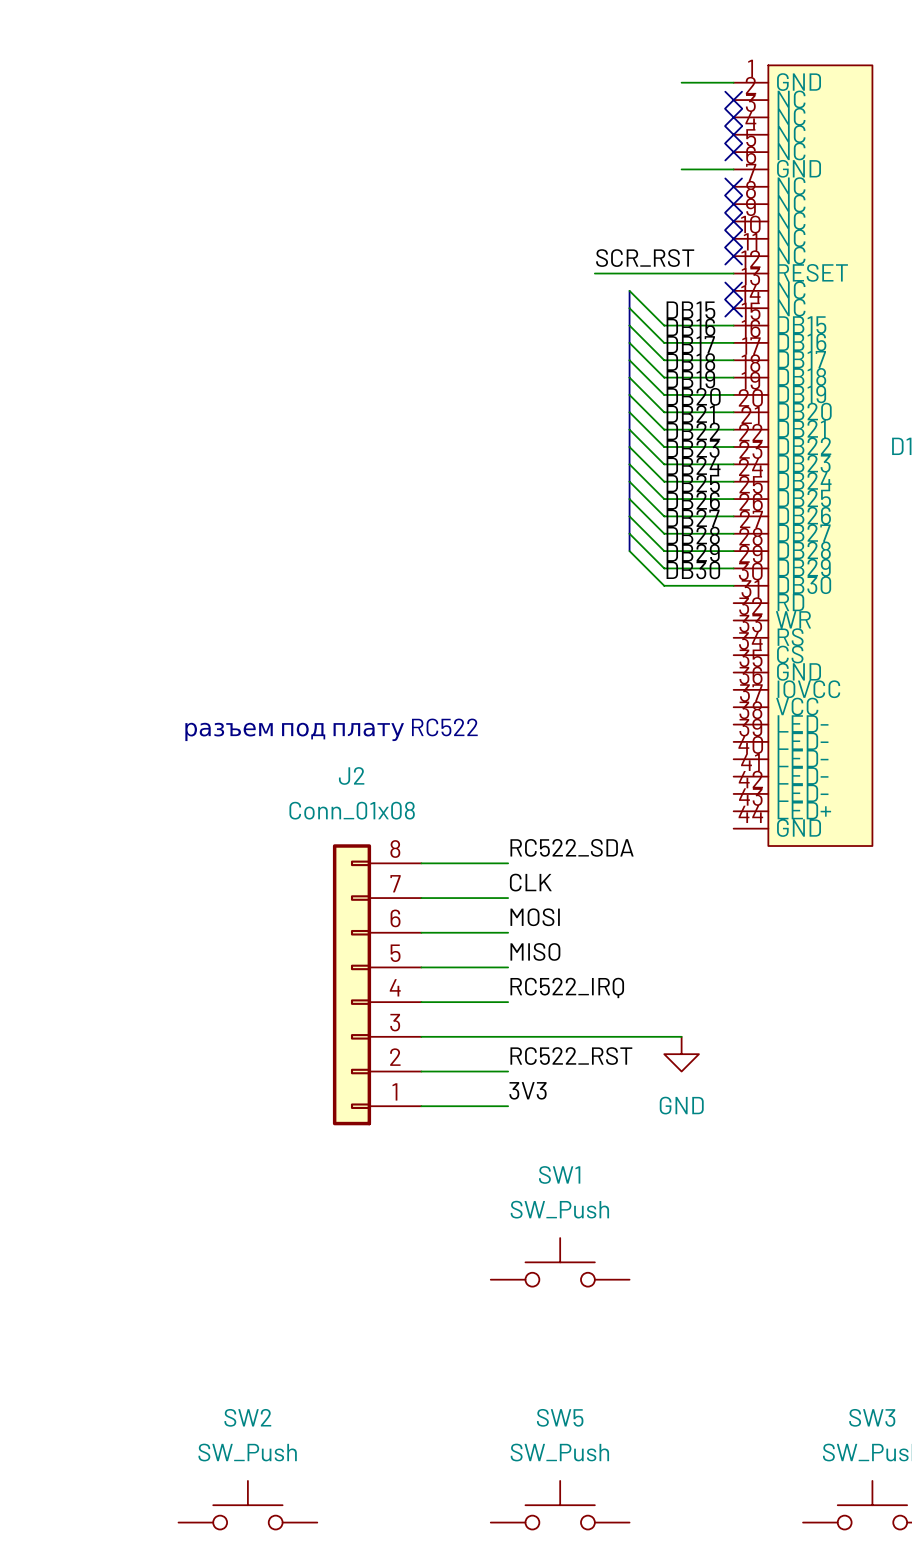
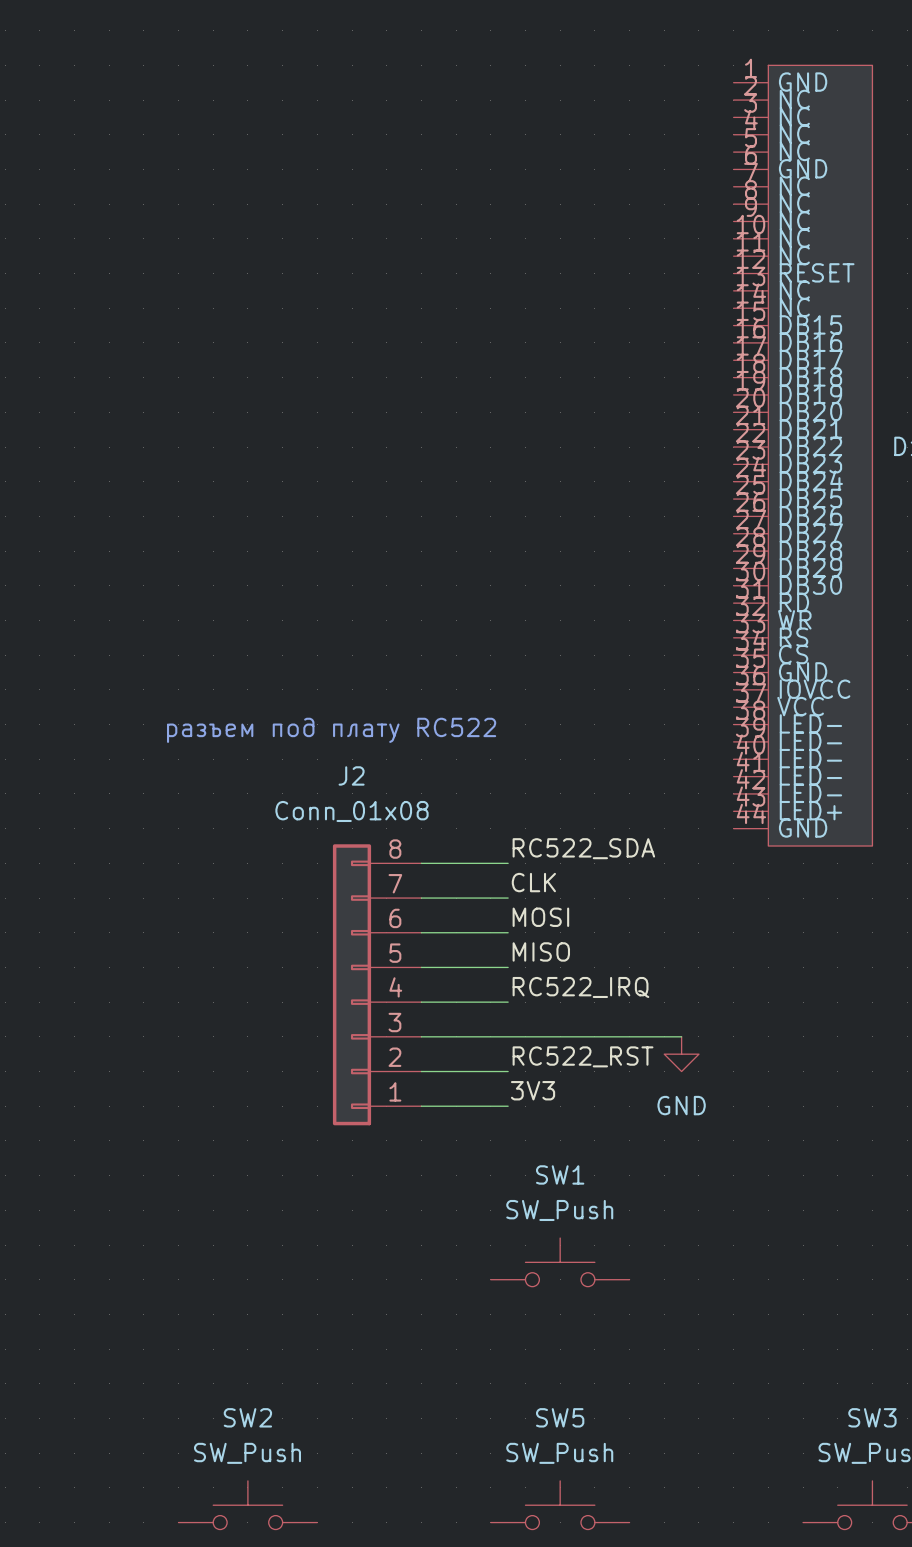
wire: (681, 82) (733, 82) -> none
no-connect mark: (733, 100) -> none
no-connect mark: (733, 117) -> none
no-connect mark: (733, 134) -> none
no-connect mark: (733, 152) -> none
wire: (681, 169) (733, 169) -> none
no-connect mark: (733, 186) -> none
no-connect mark: (733, 204) -> none
no-connect mark: (733, 221) -> none
no-connect mark: (733, 238) -> none
no-connect mark: (733, 256) -> none
label: SCR_RST (645, 258) -> none
wire: (594, 273) (733, 273) -> none
wire: (629, 290) (664, 325) (733, 325) -> none
bus: (629, 290) (629, 551) -> none
no-connect mark: (733, 290) -> none
wire: (629, 308) (664, 342) (733, 342) -> none
no-connect mark: (733, 308) -> none
label: DB15 (690, 310) -> none
wire: (629, 325) (664, 360) (733, 360) -> none
label: DB16 (690, 327) -> none
wire: (629, 342) (664, 377) (733, 377) -> none
label: DB17 (690, 344) -> none
wire: (629, 360) (664, 394) (733, 394) -> none
label: DB18 (690, 362) -> none
wire: (629, 377) (664, 412) (733, 412) -> none
label: DB19 (690, 379) -> none
wire: (629, 394) (664, 429) (733, 429) -> none
label: DB20 (693, 396) -> none
wire: (629, 412) (664, 447) (733, 447) -> none
label: DB21 (690, 414) -> none
wire: (629, 429) (664, 464) (733, 464) -> none
label: DB22 (693, 431) -> none
wire: (629, 447) (664, 481) (733, 481) -> none
label: DB23 (693, 448) -> none
wire: (629, 464) (664, 499) (733, 499) -> none
label: DB24 (693, 466) -> none
wire: (629, 481) (664, 516) (733, 516) -> none
label: DB25 (693, 483) -> none
wire: (629, 499) (664, 533) (733, 533) -> none
label: DB26 (693, 500) -> none
wire: (629, 516) (664, 551) (733, 551) -> none
label: DB27 (693, 518) -> none
wire: (629, 533) (664, 568) (733, 568) -> none
label: DB28 (693, 535) -> none
wire: (629, 551) (664, 585) (733, 585) -> none
label: DB29 (693, 552) -> none
label: DB30 (693, 570) -> none

